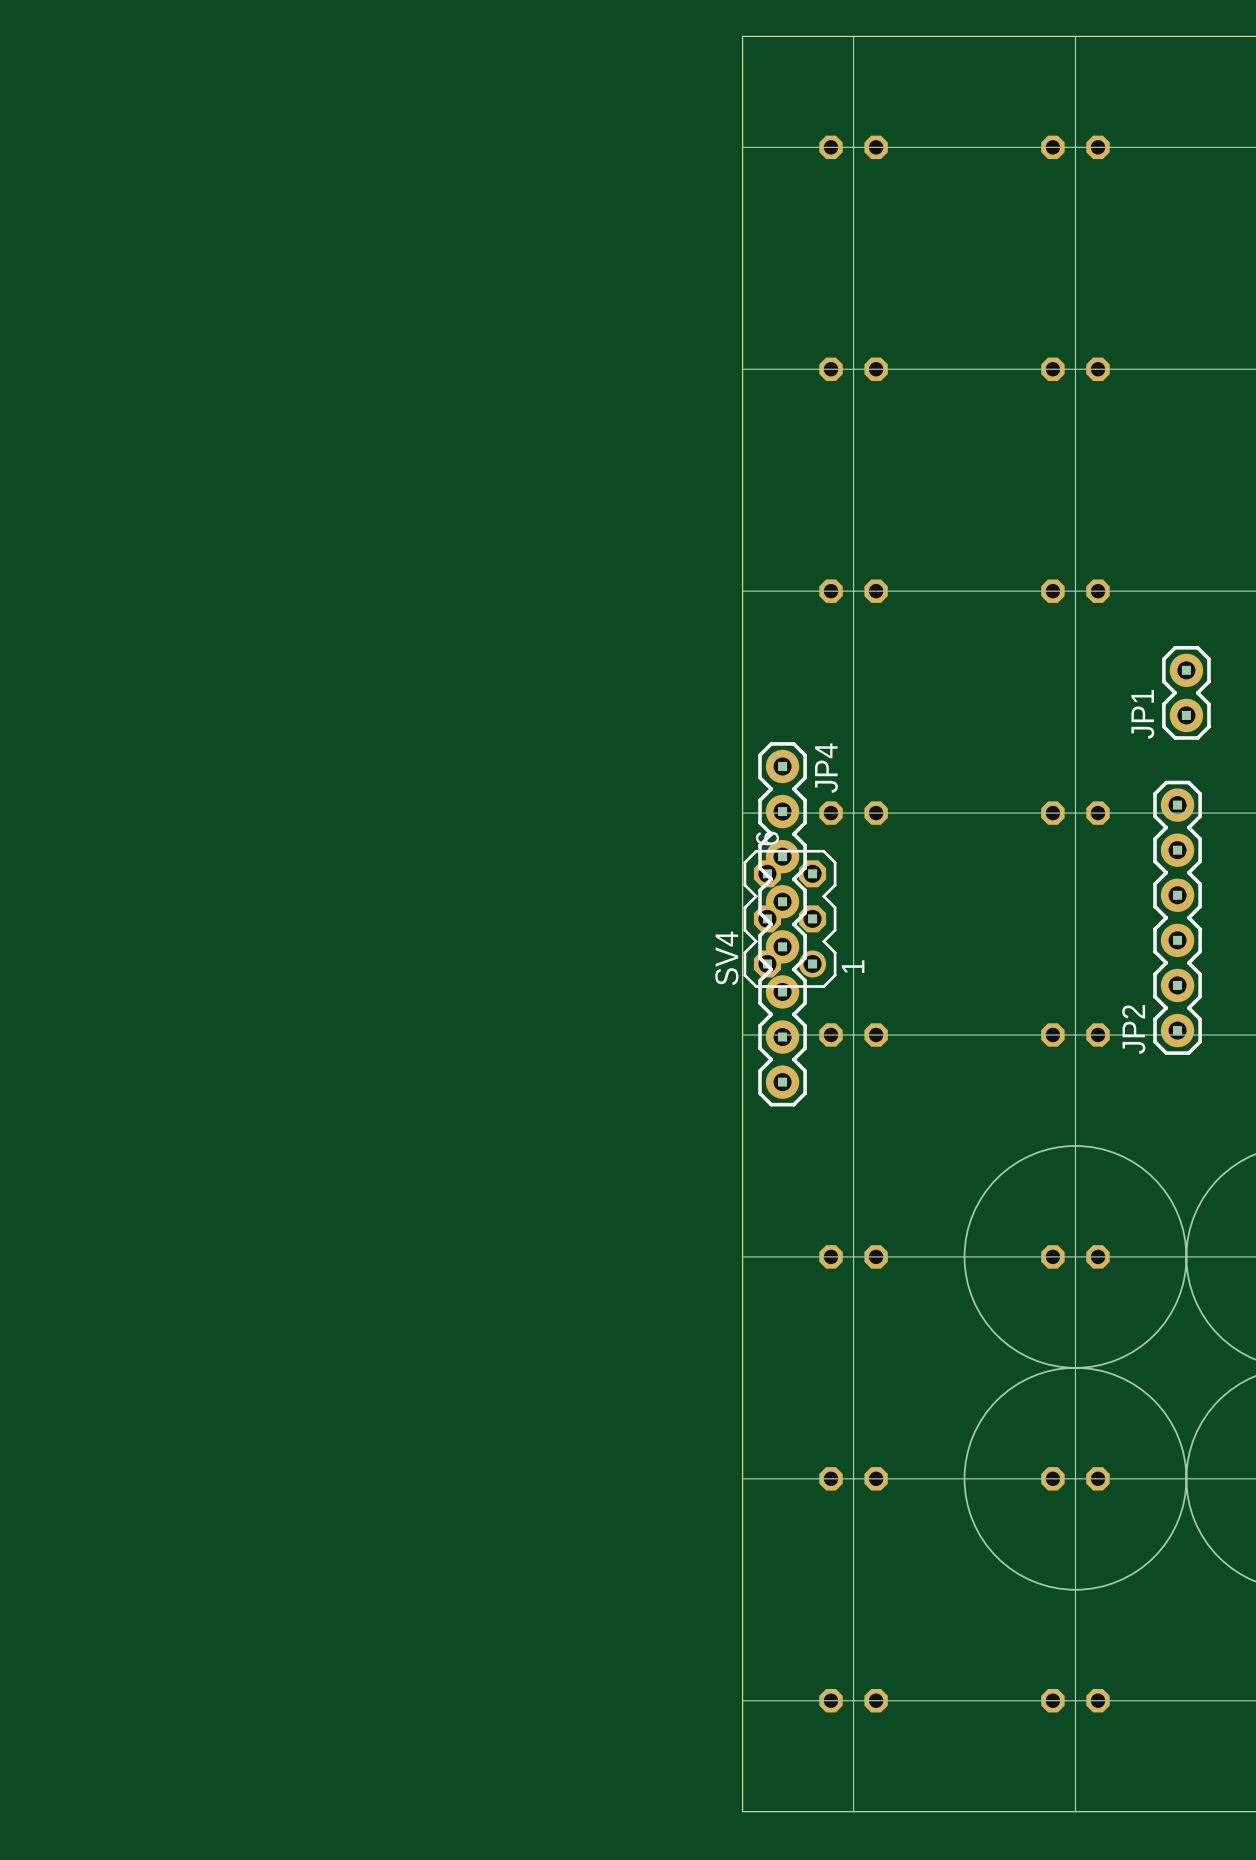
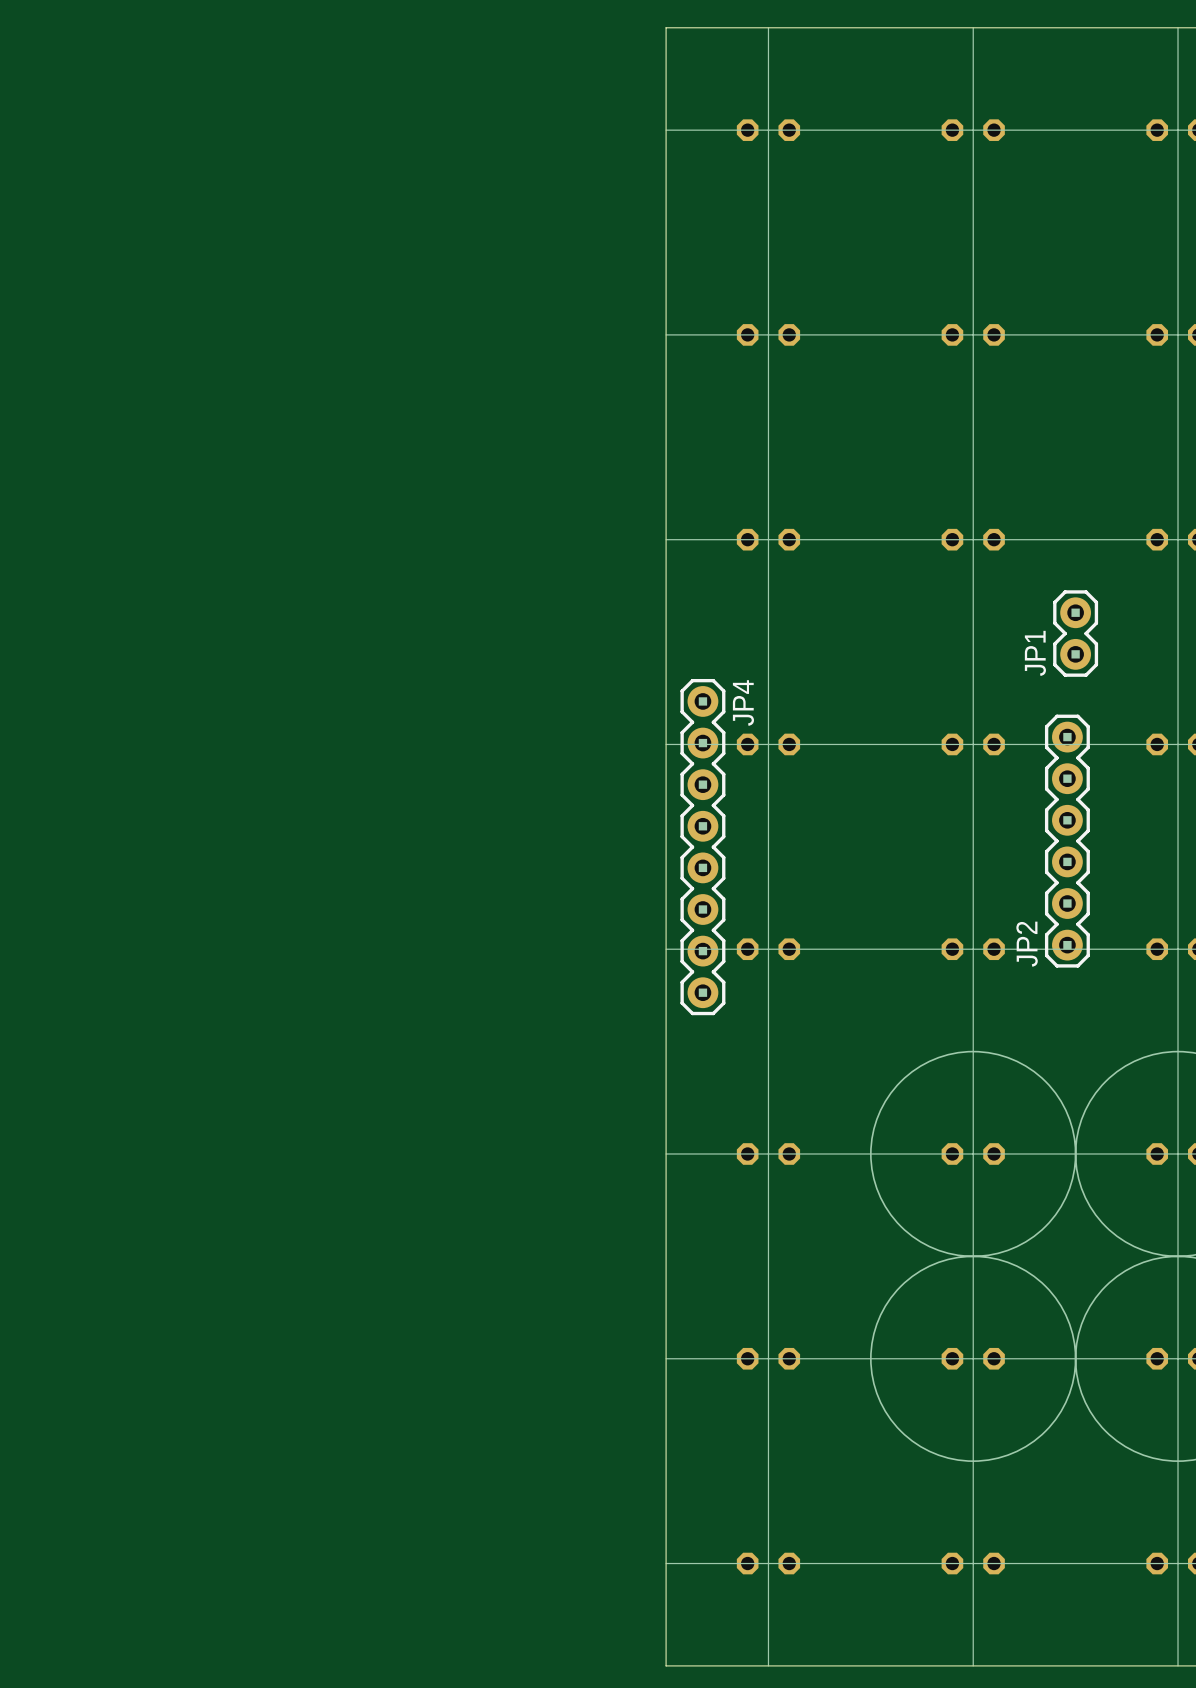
SV4: (790, 918) -> none

